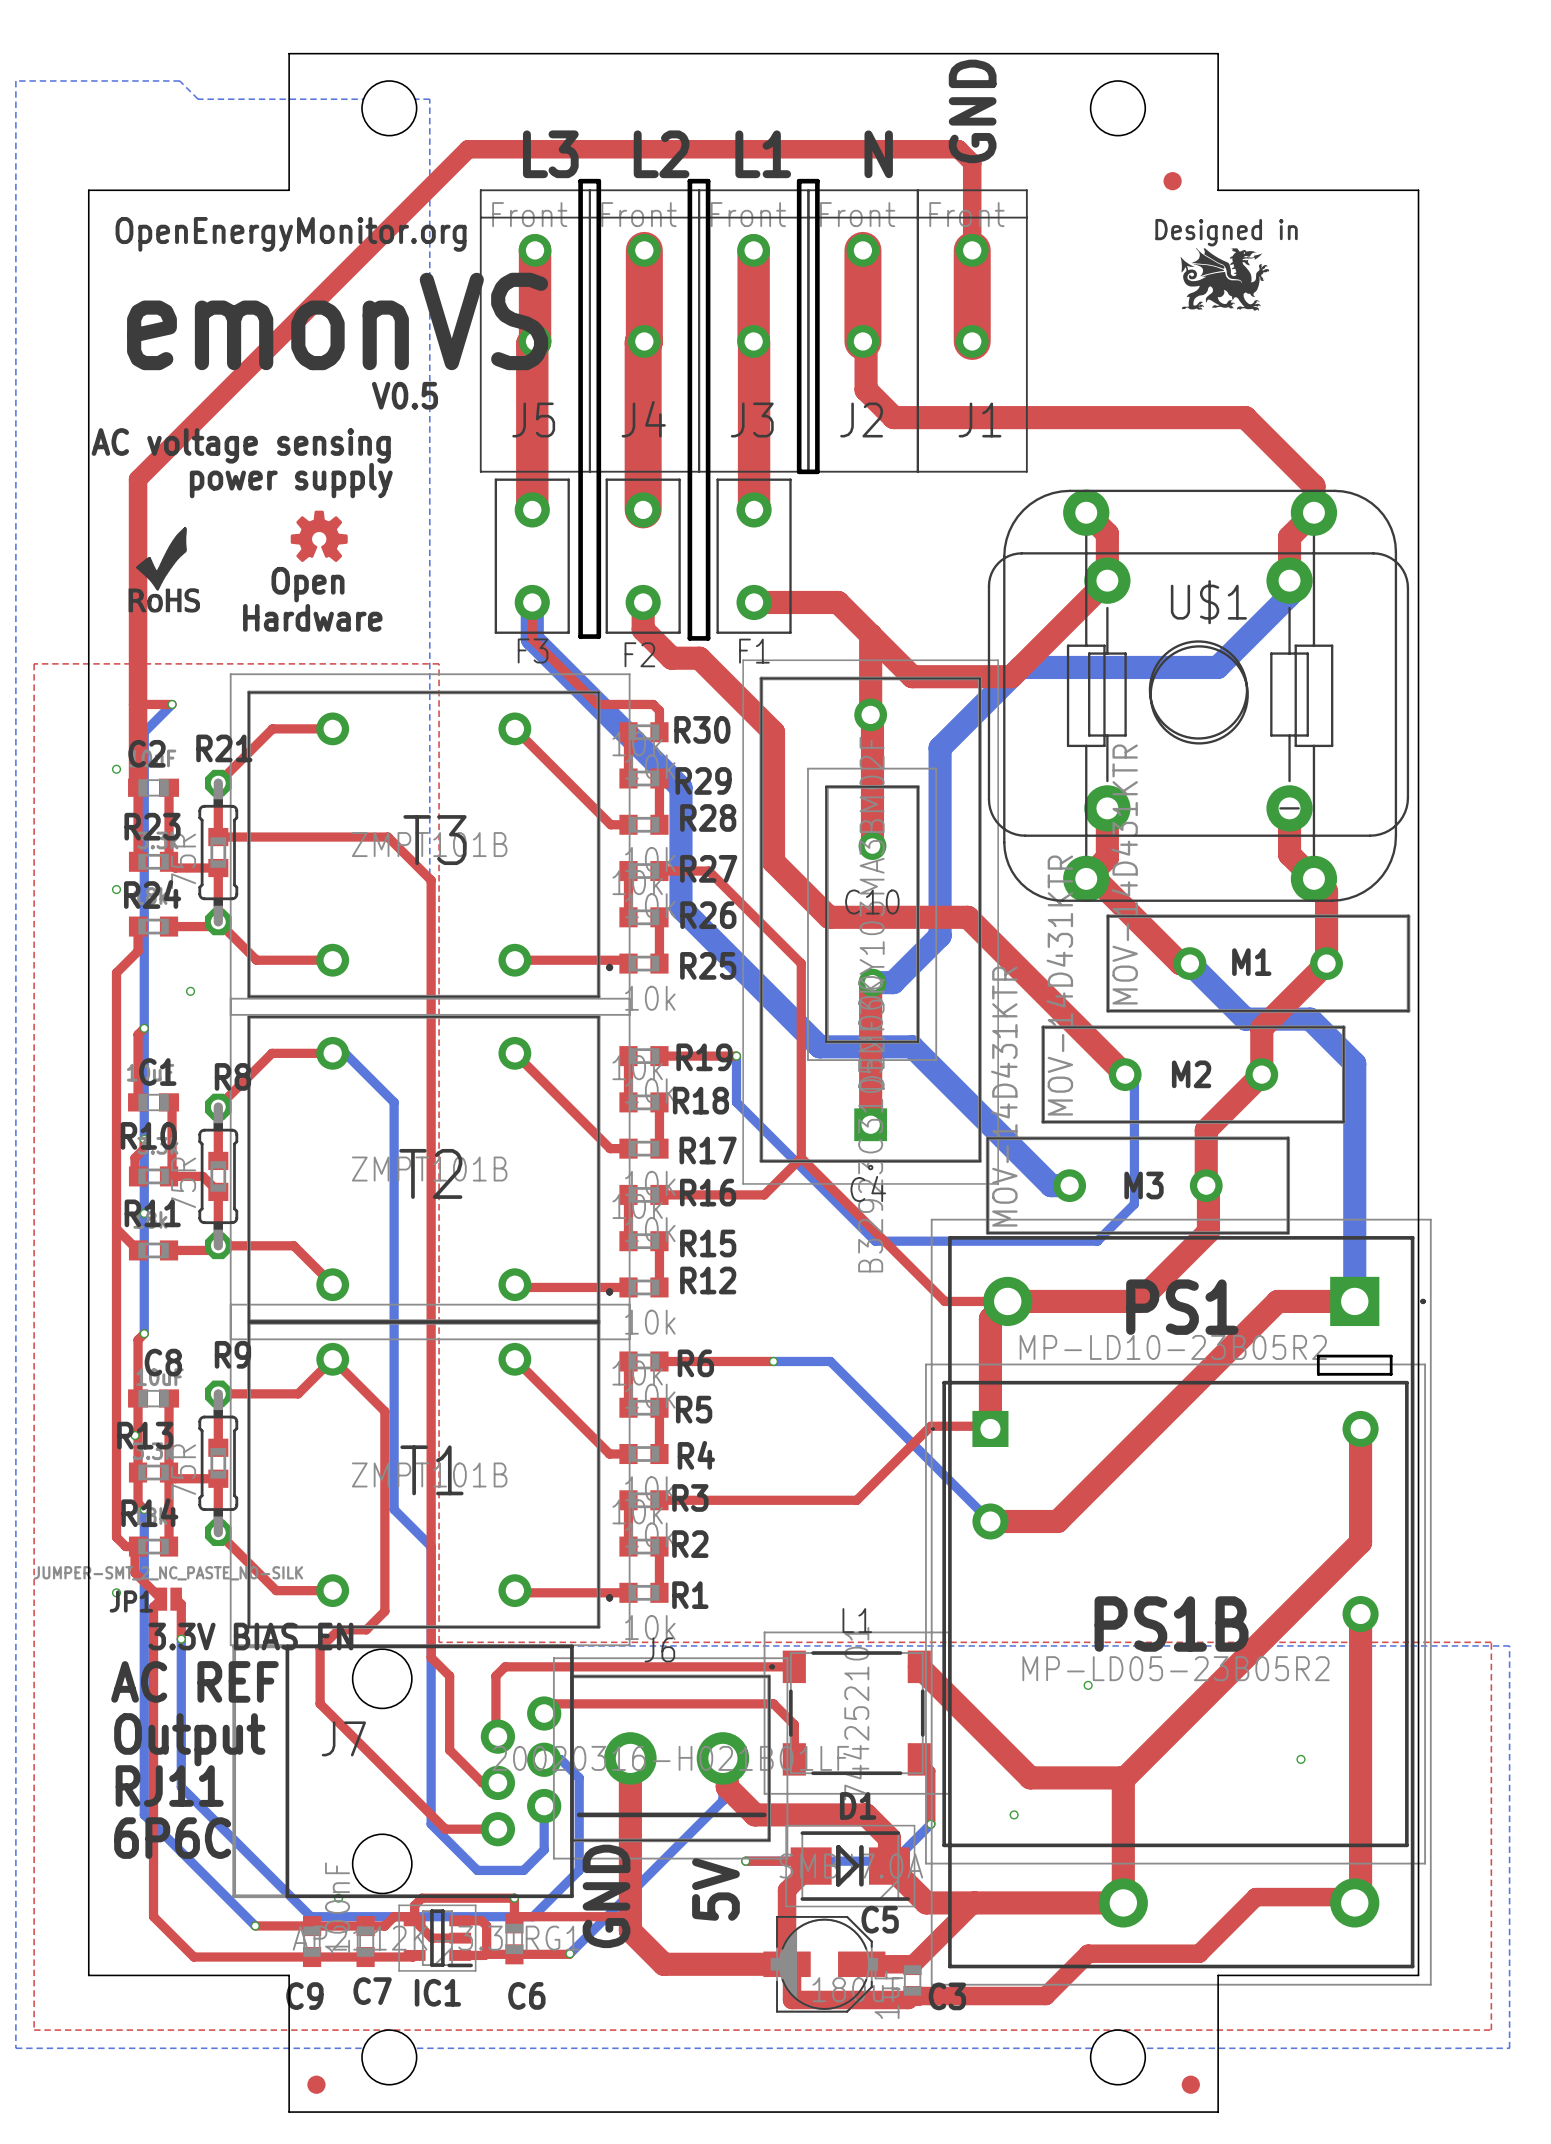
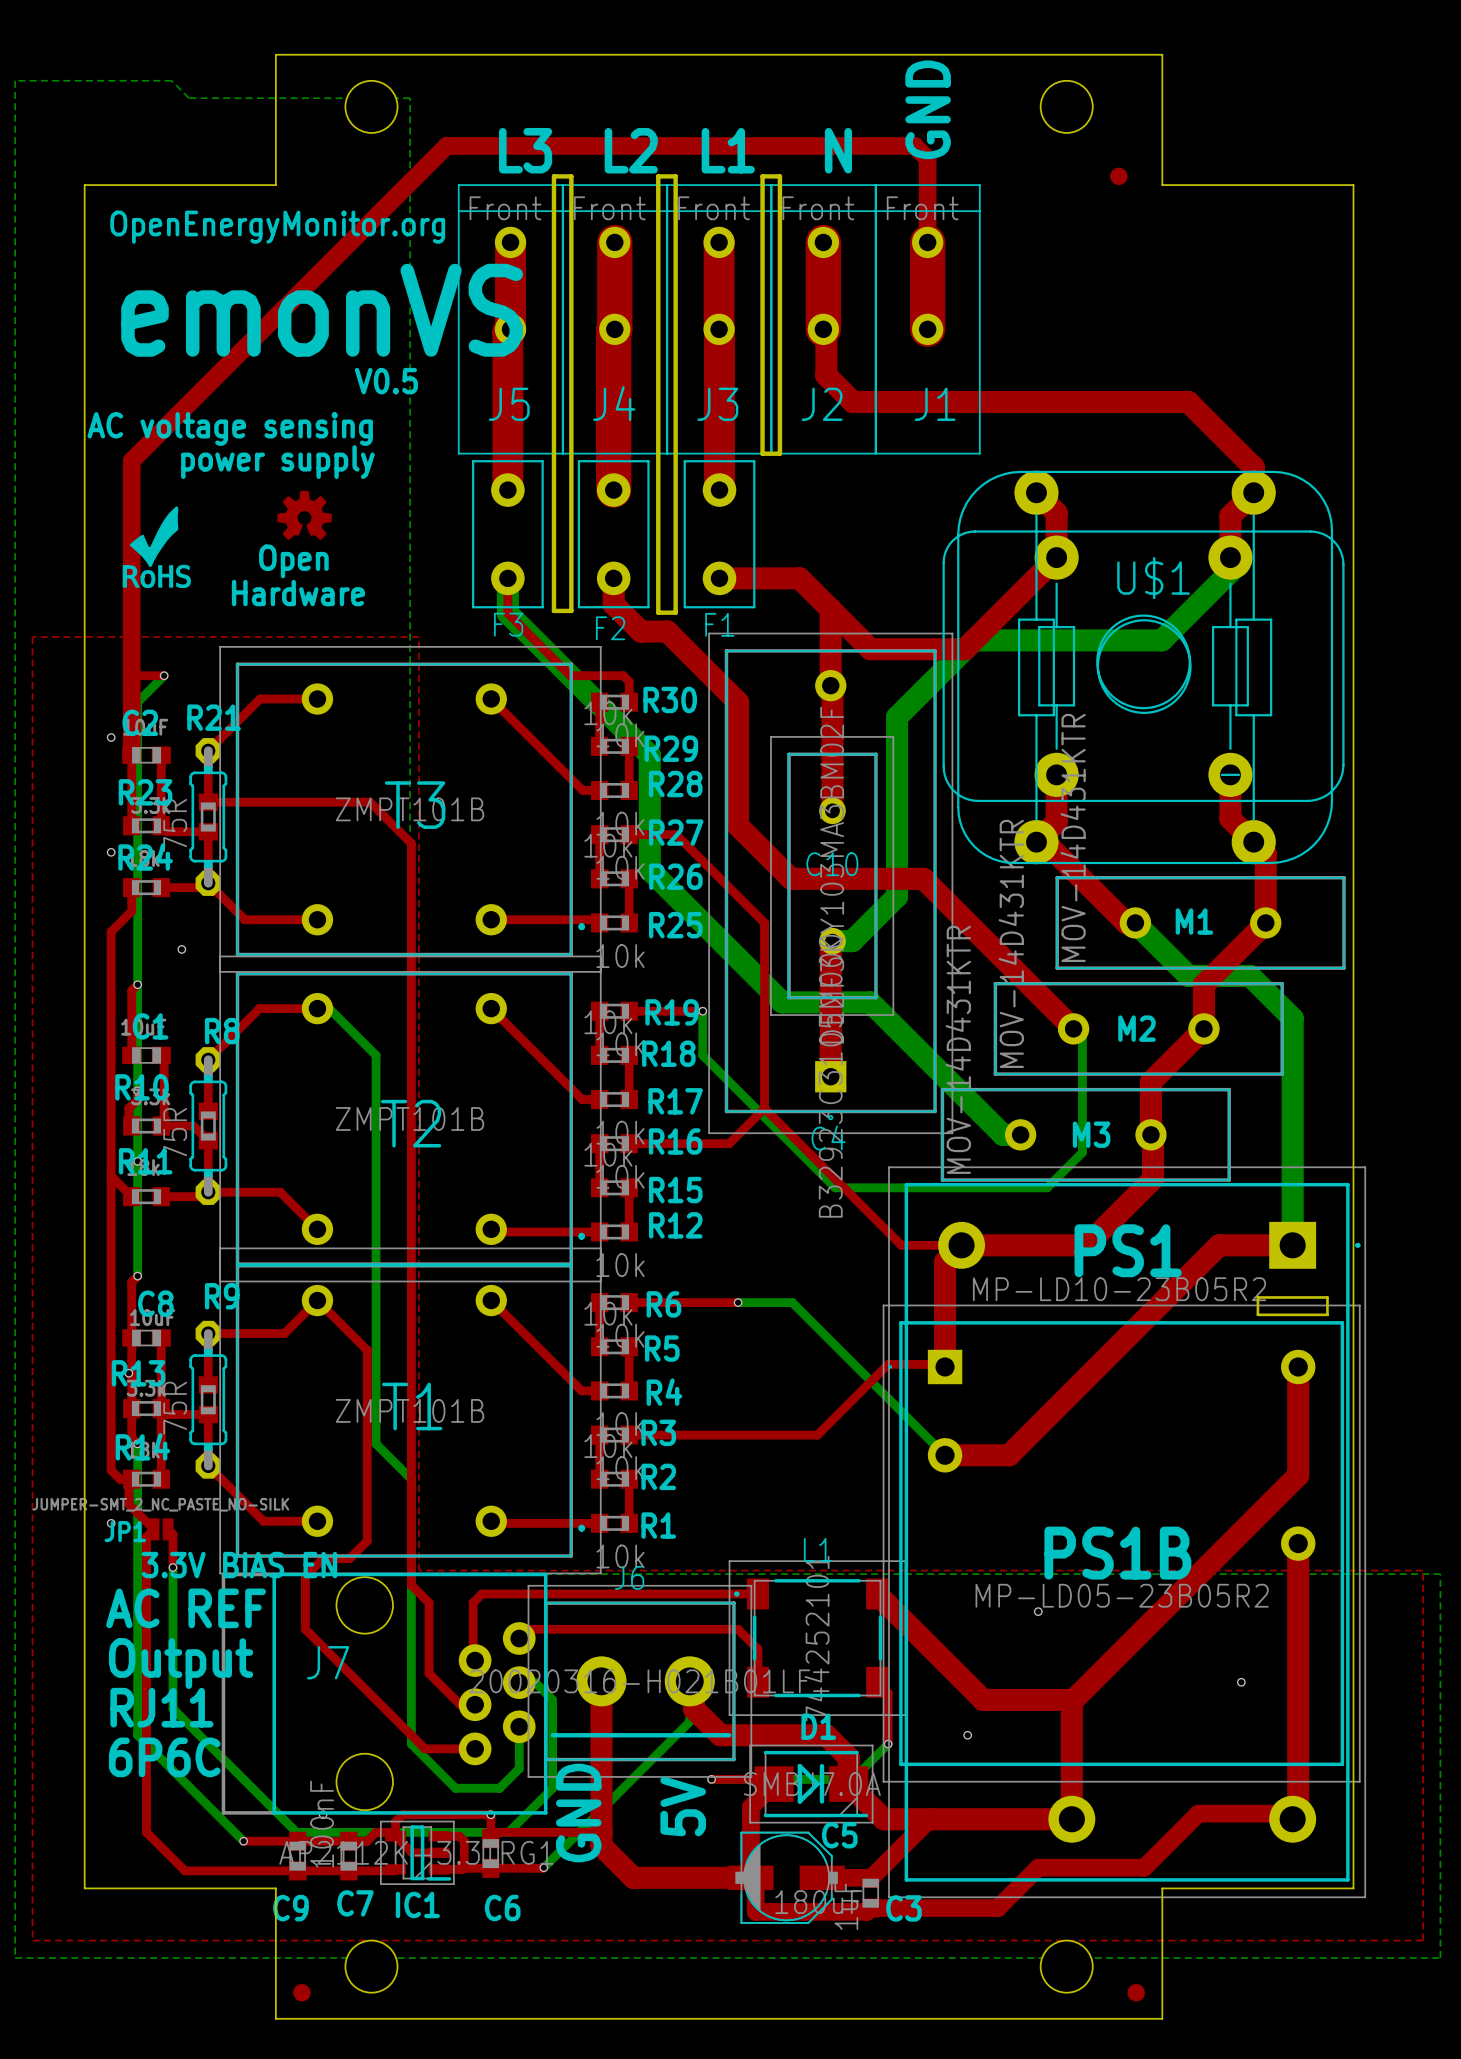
text: Designed in (1226, 232) -> none
drawing: [1180, 248, 1270, 311] -> none

